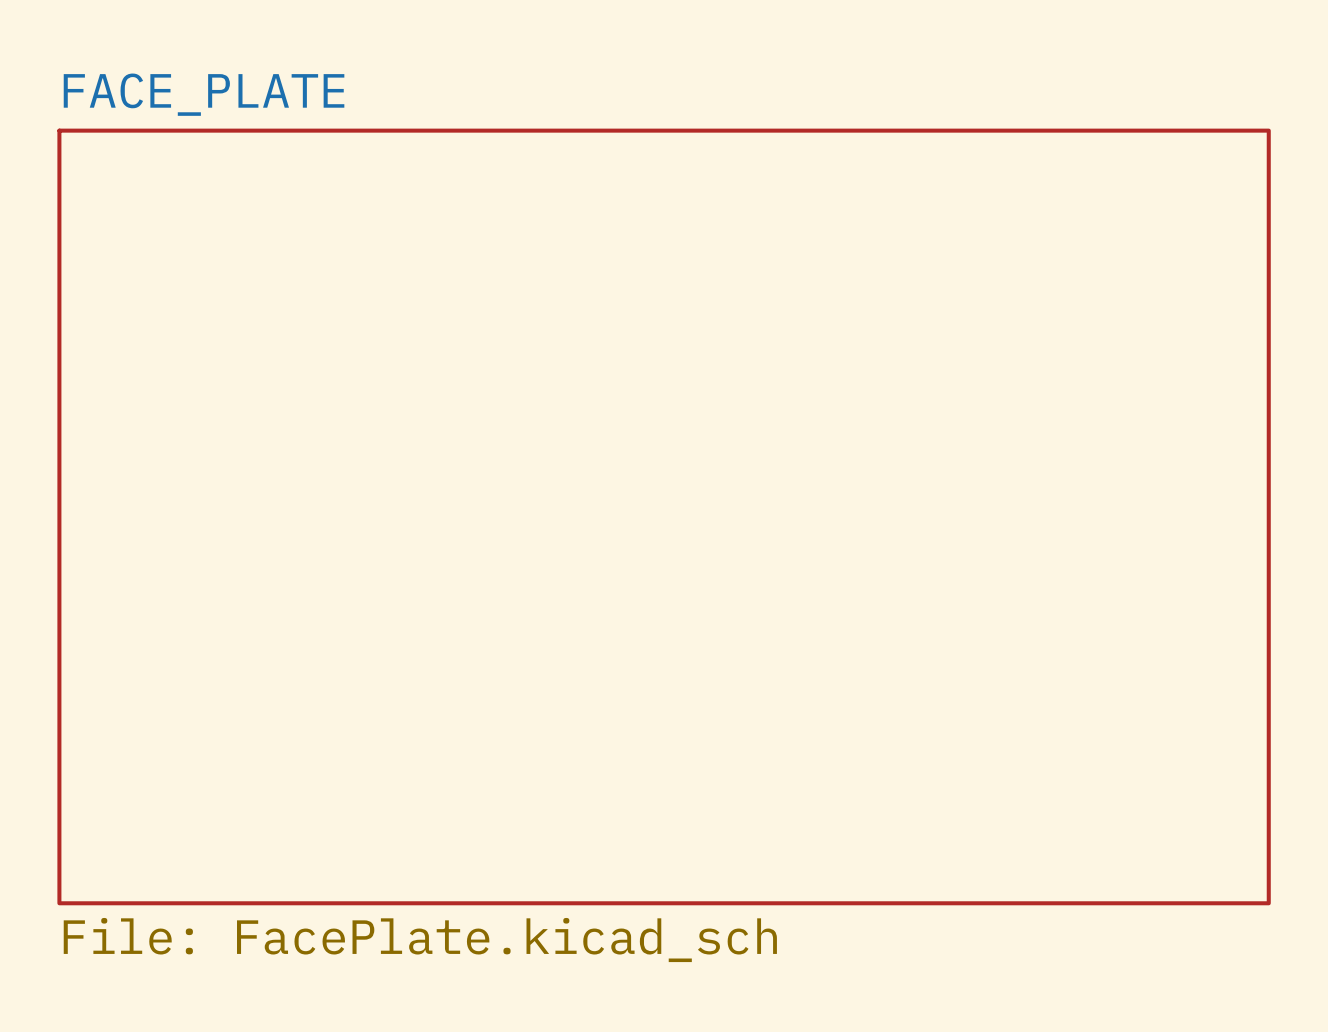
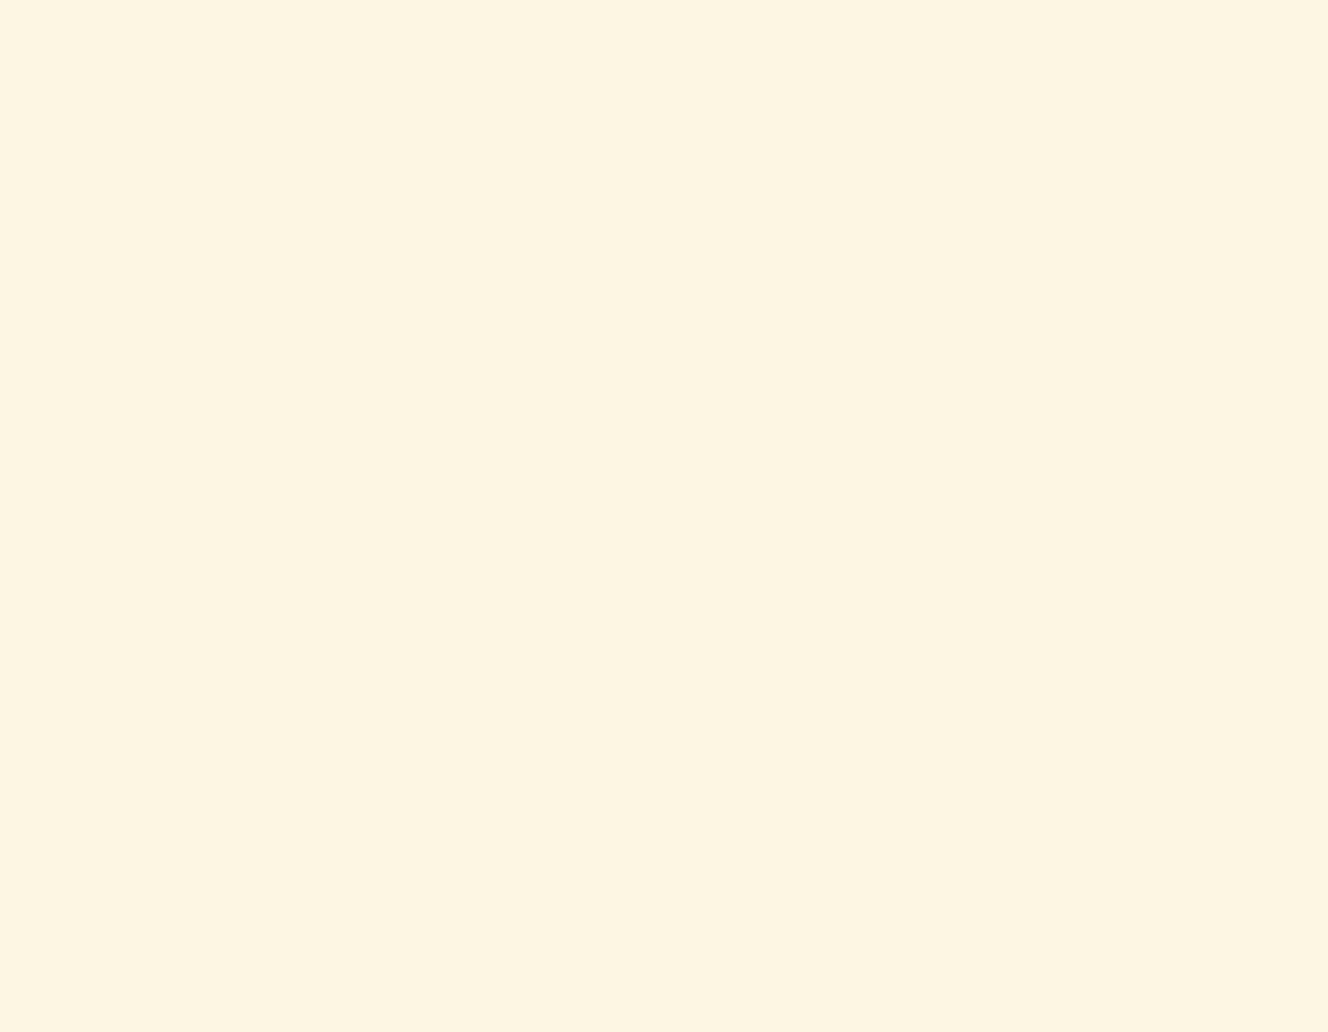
sheet FACE_PLATE: File: FacePlate.kicad_sch (664, 516) -> none

